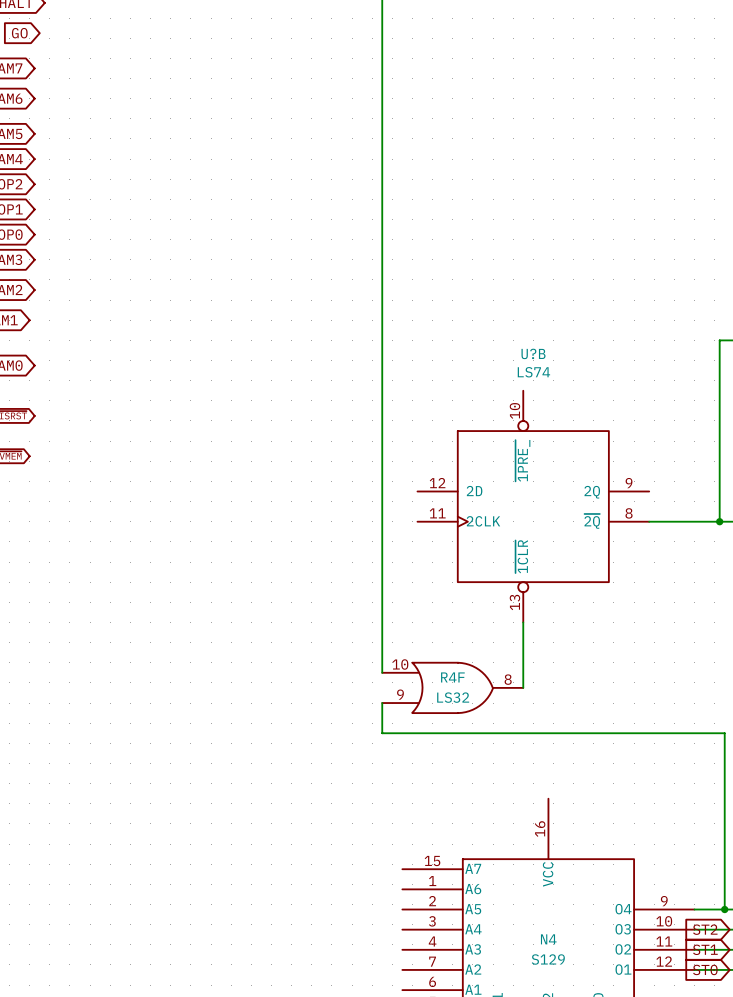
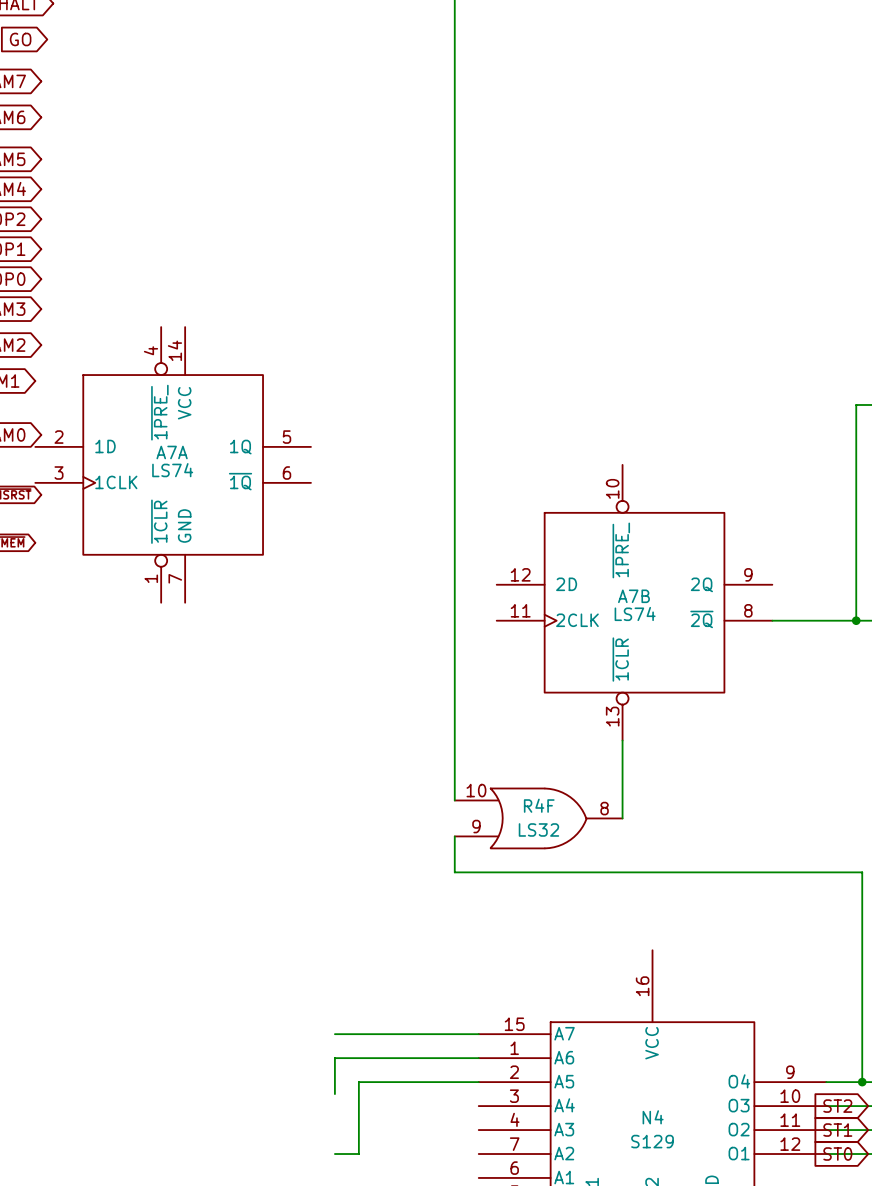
U?B name: U?B (533, 353) -> A7B (633, 596)
U?B value position: LS74 (533, 372) -> LS74 (635, 613)
A7A: none -> LS74 (173, 464)
wire: none -> (334, 1034) (478, 1034)
wire: none -> (478, 1058) (334, 1058) (334, 1094)
wire: none -> (478, 1082) (358, 1082) (358, 1154) (334, 1154)

